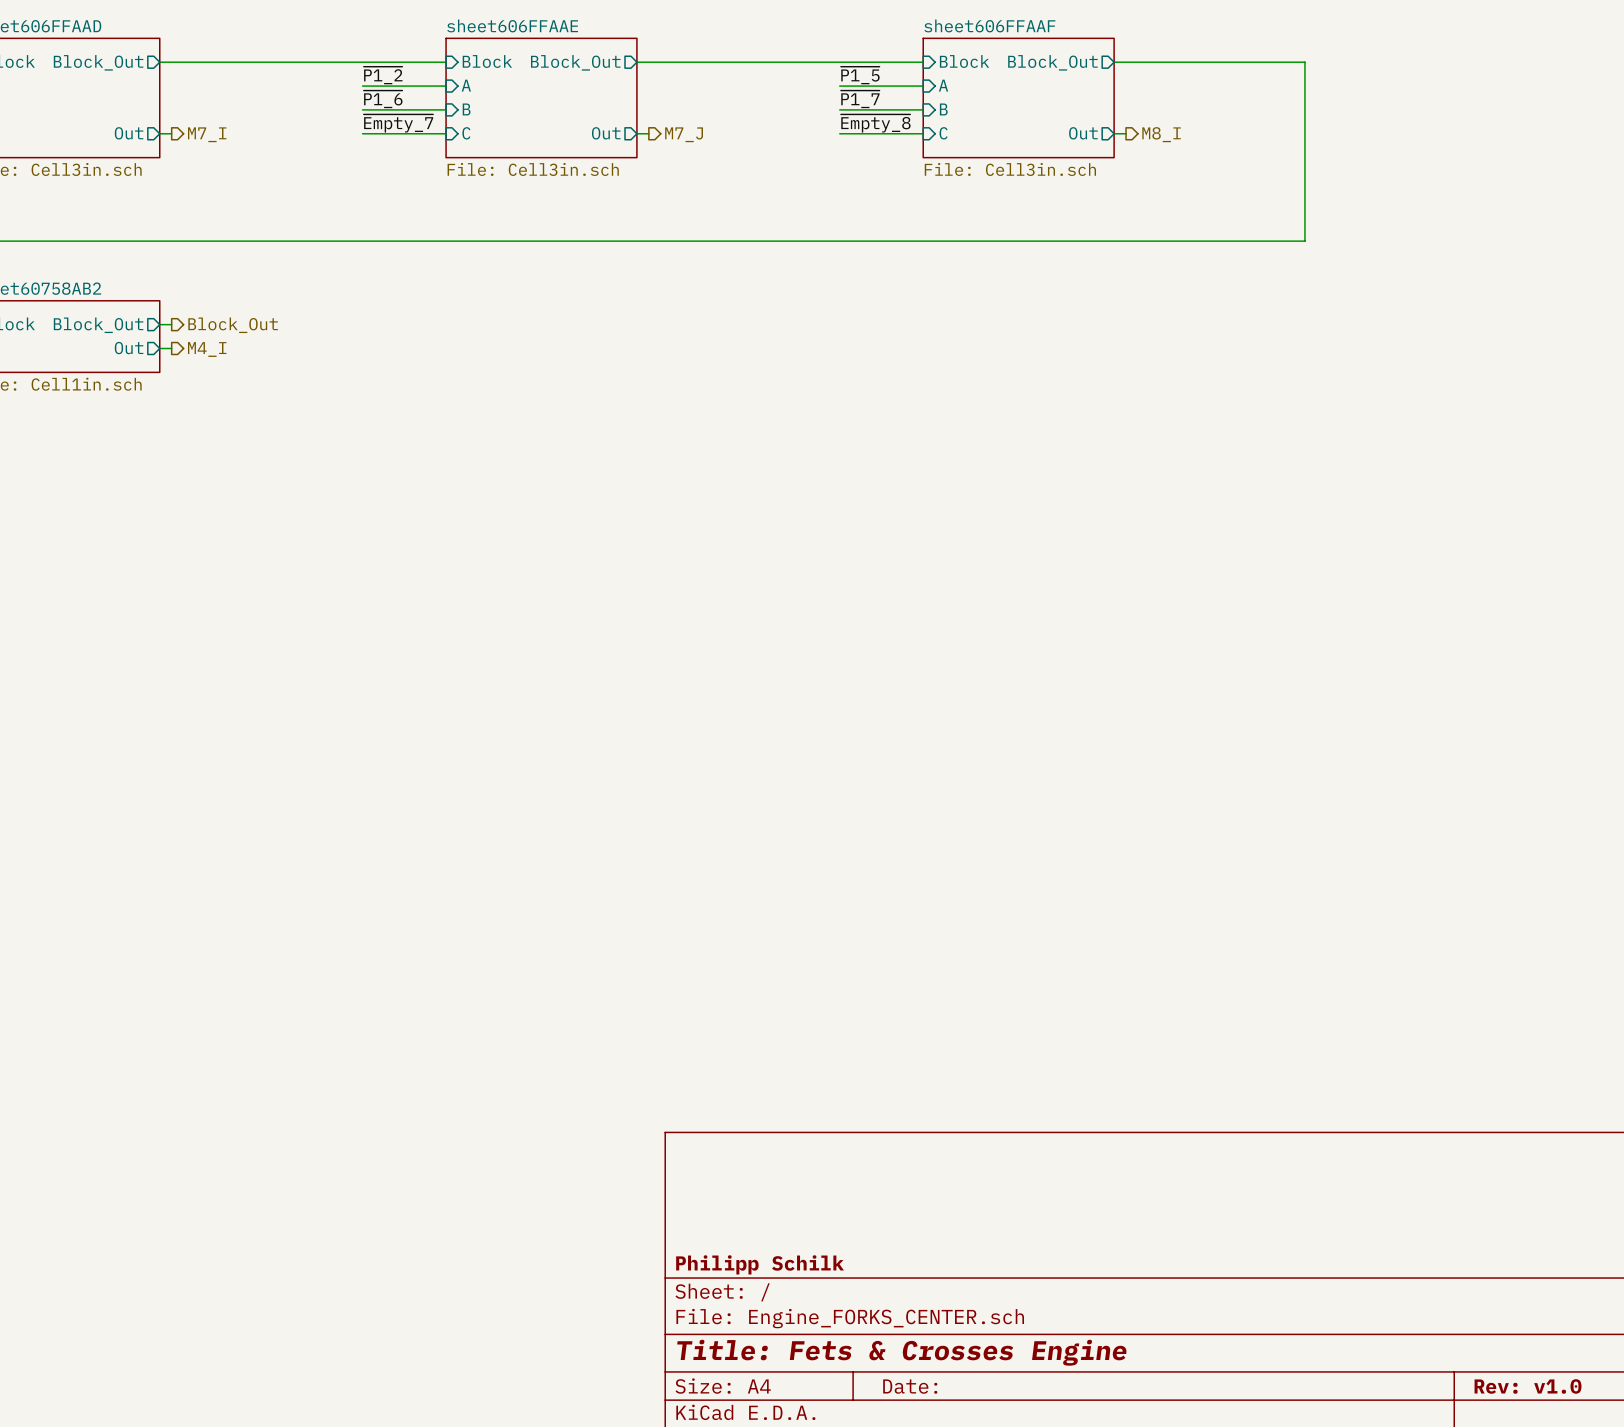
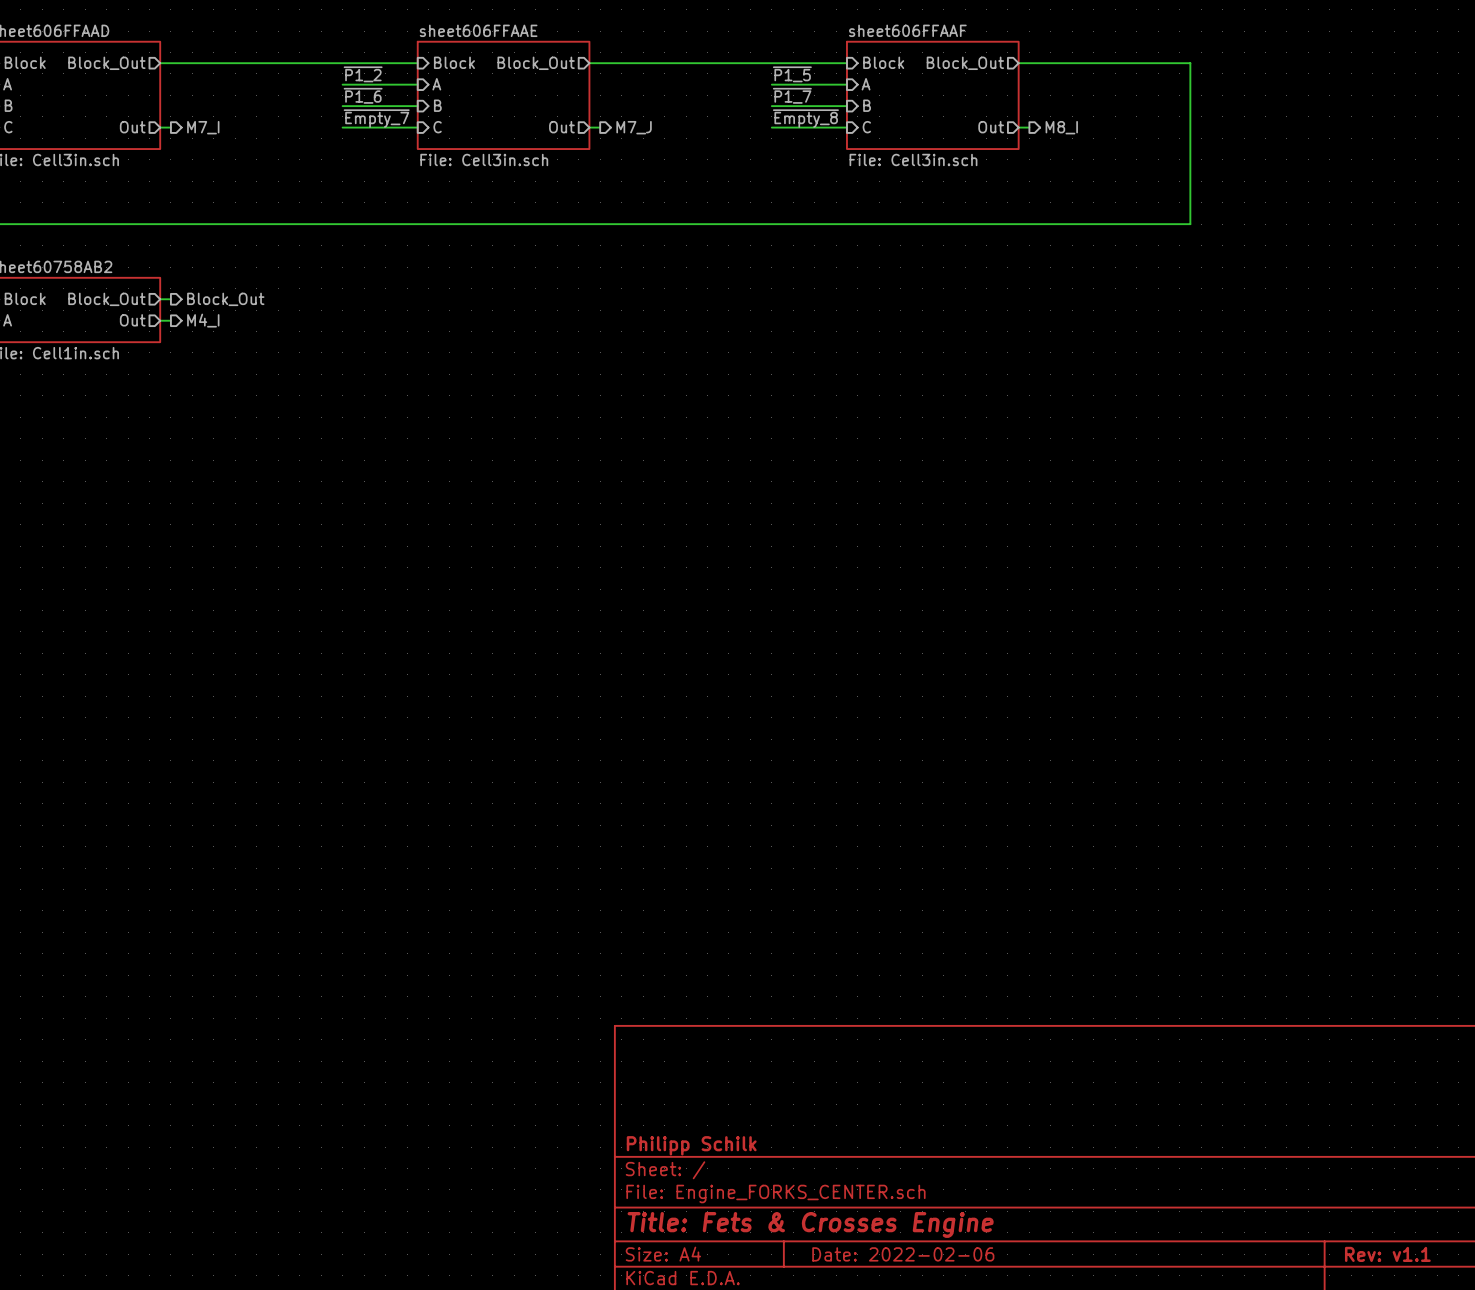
title block: Date: (910, 1386) -> Date: 2022-02-06 (903, 1254)
title block: Rev: v1.0 (1528, 1386) -> Rev: v1.1 (1387, 1254)

